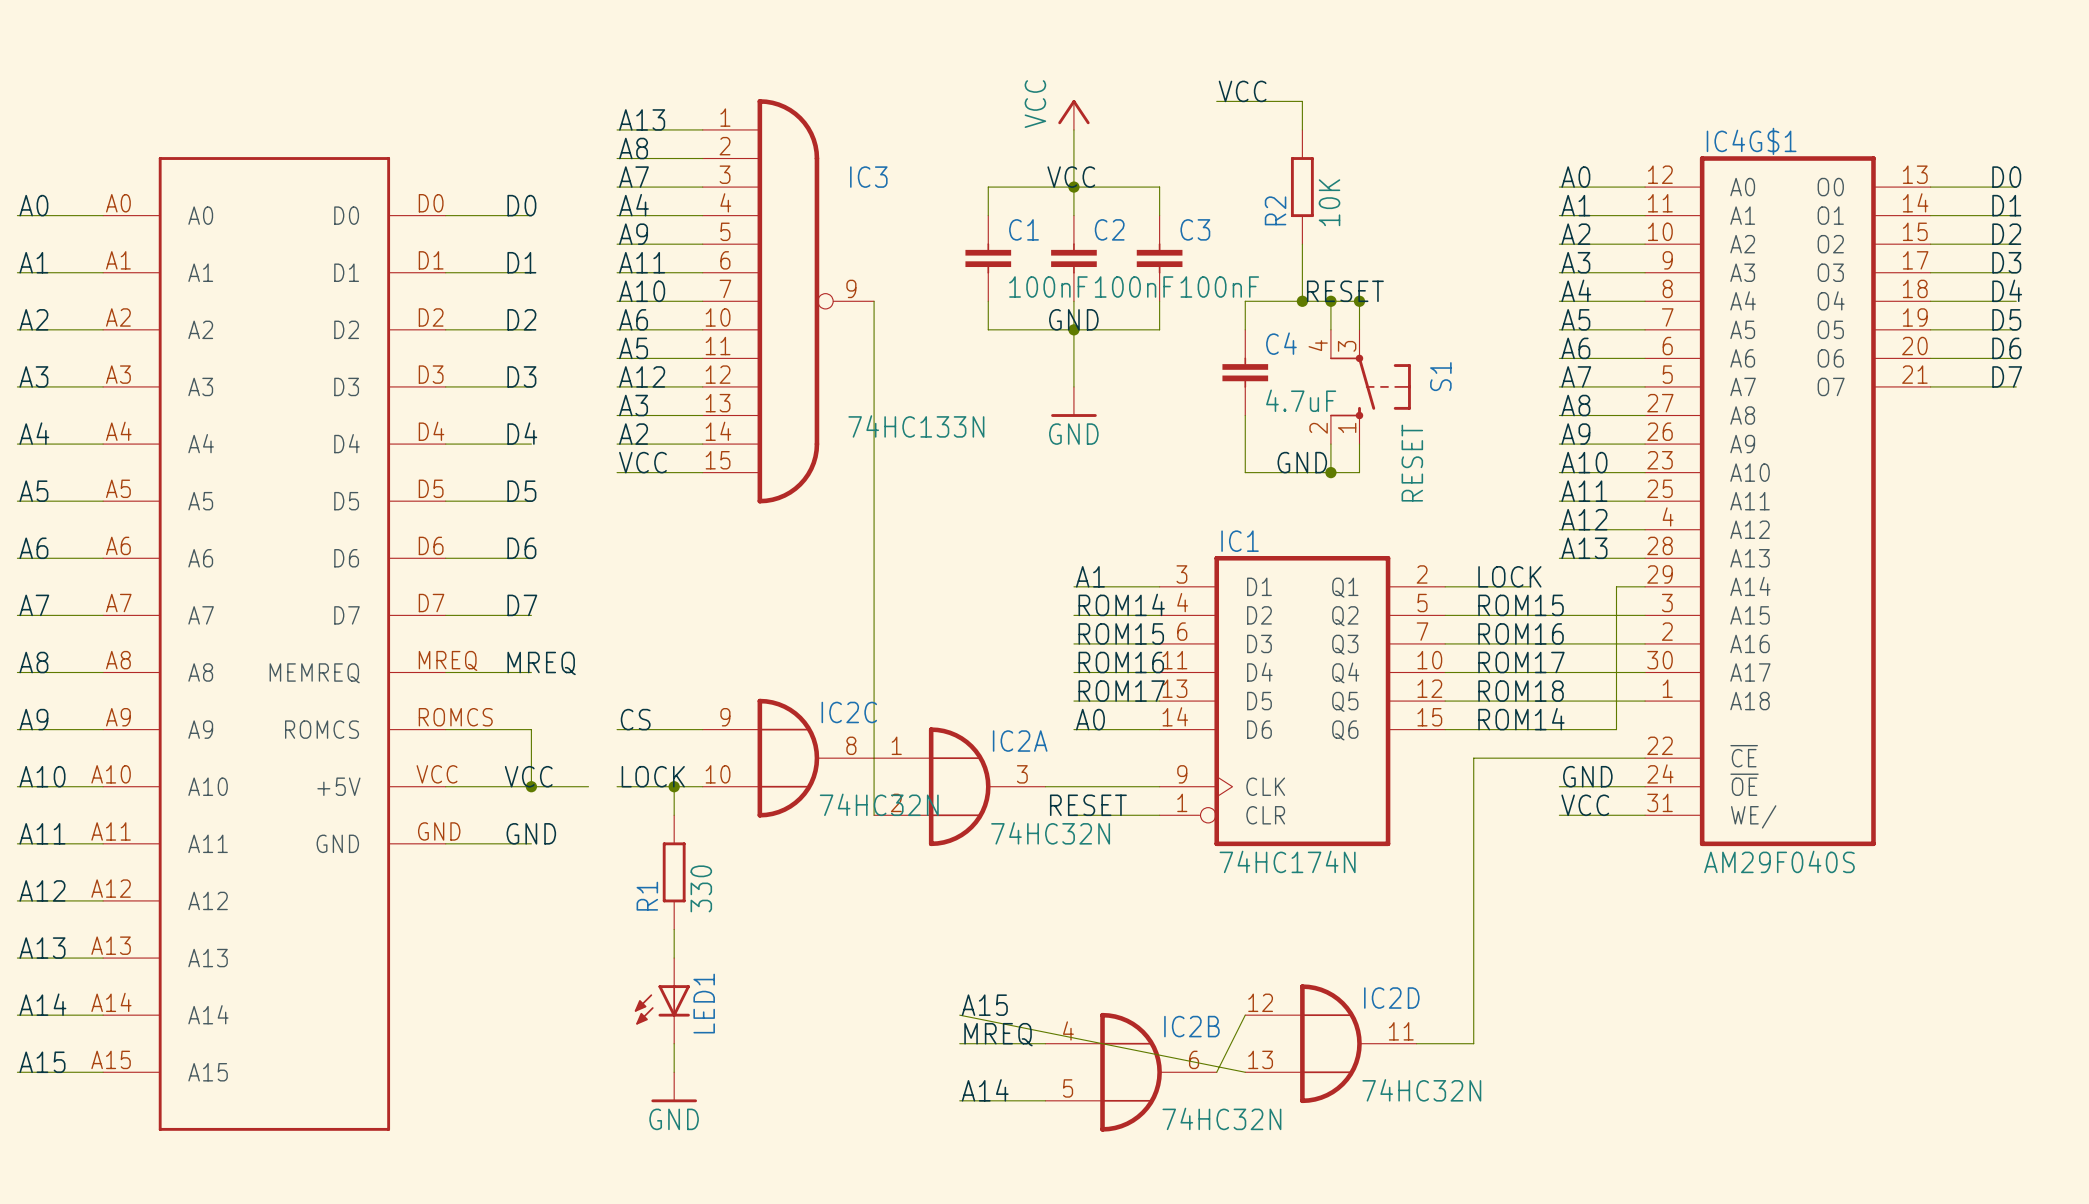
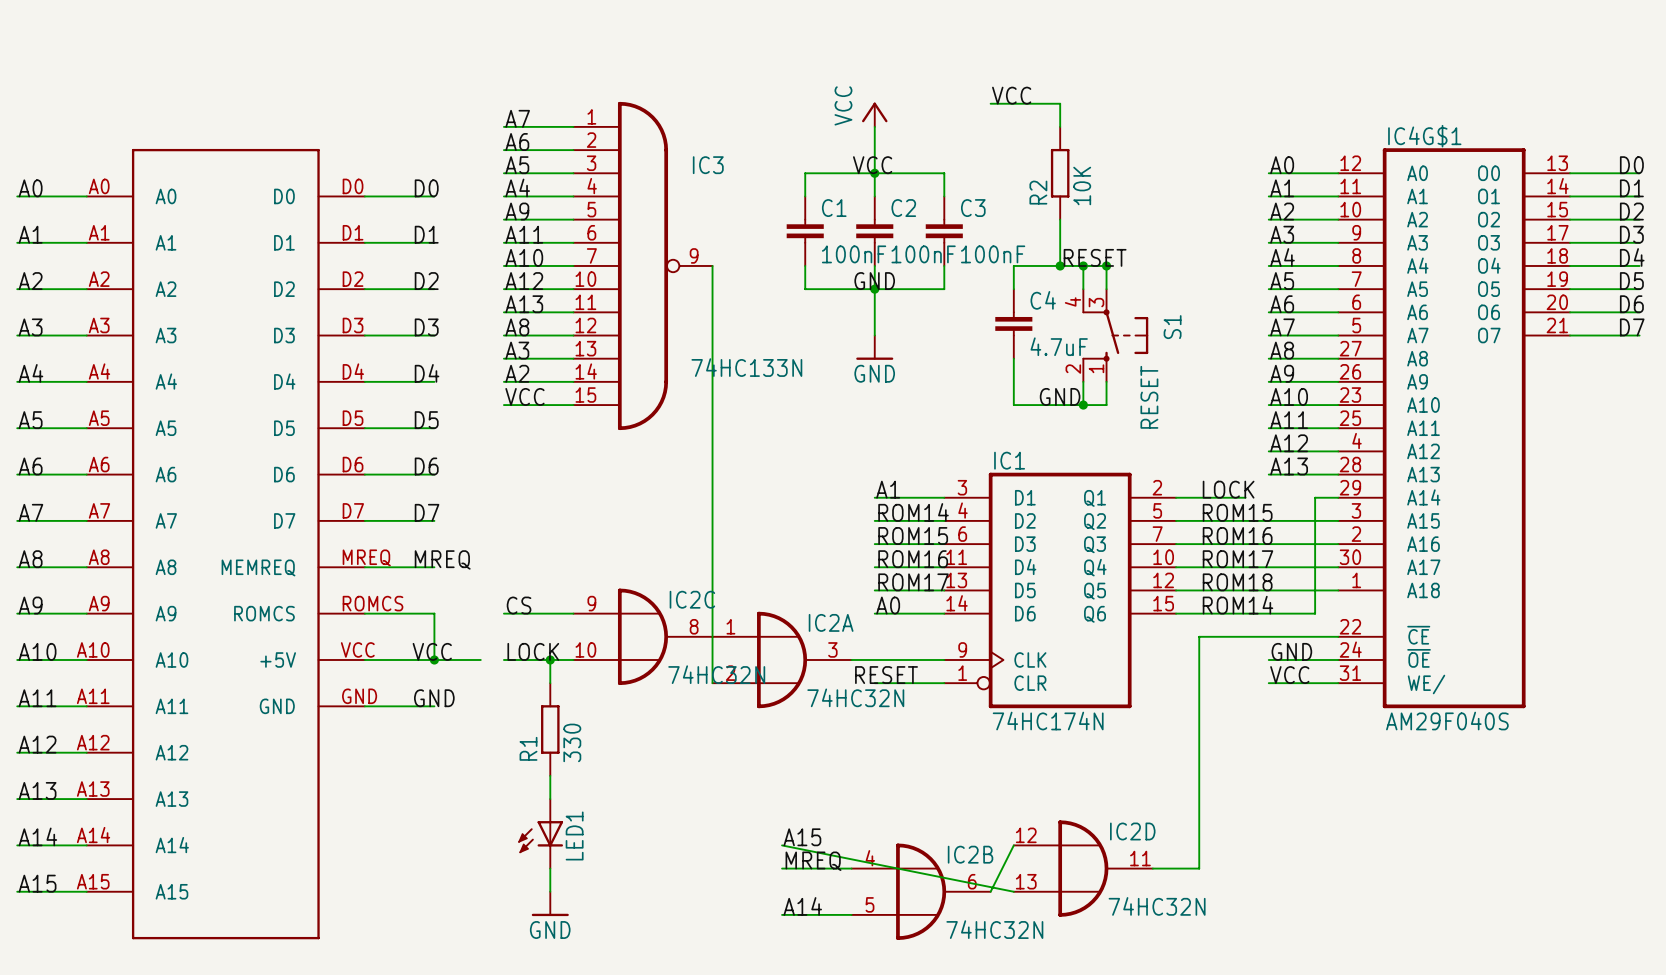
label: A13 (642, 119) -> A7 (517, 118)
label: A8 (633, 148) -> A6 (517, 141)
label: A7 (633, 177) -> A5 (517, 165)
label: A6 (633, 319) -> A12 (524, 281)
label: A5 (633, 348) -> A13 (524, 304)
label: A12 (642, 376) -> A8 (517, 327)

